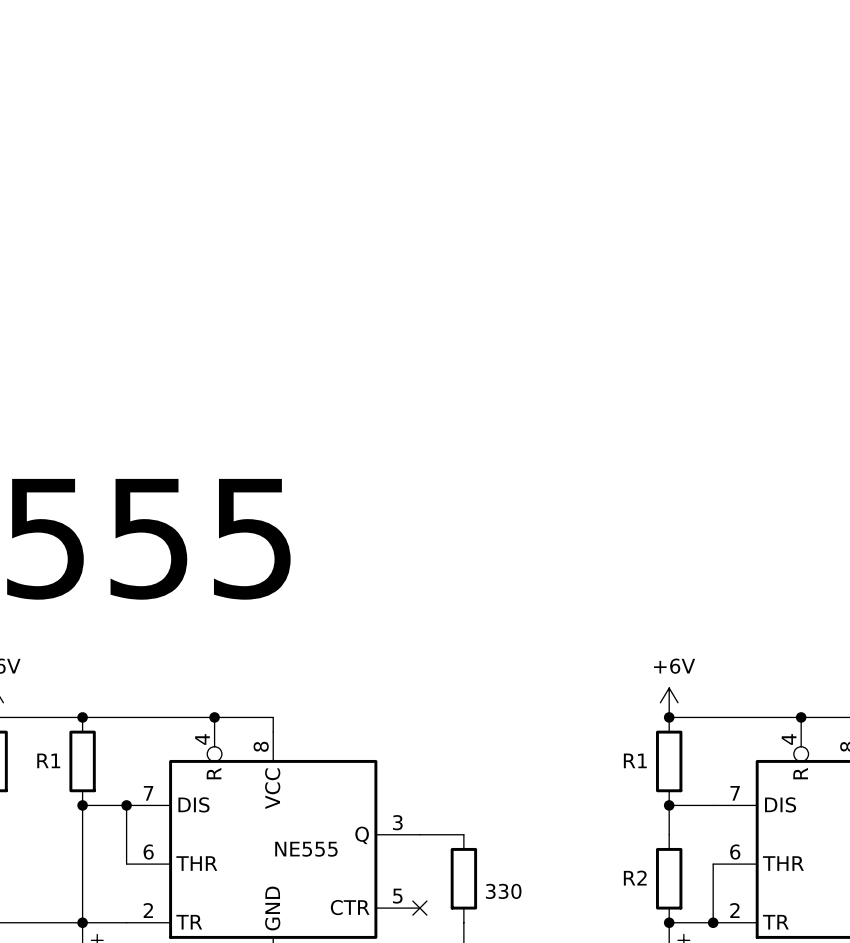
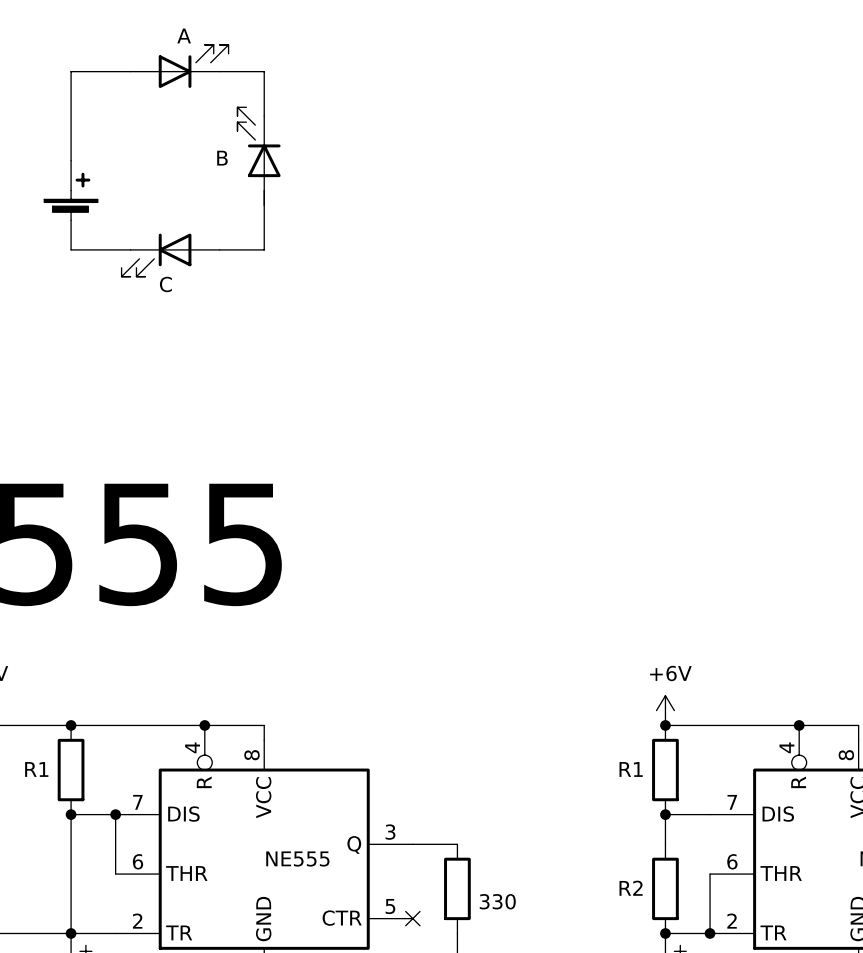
A: none -> (179, 66)
wire: none -> (130, 71) (71, 71) (71, 160)
wire: none -> (219, 71) (264, 71) (264, 116)
B: none -> (259, 156)
wire: none -> (264, 190) (264, 249) (219, 249)
part: none -> (71, 205)
wire: none -> (71, 249) (130, 249)
C: none -> (170, 255)

